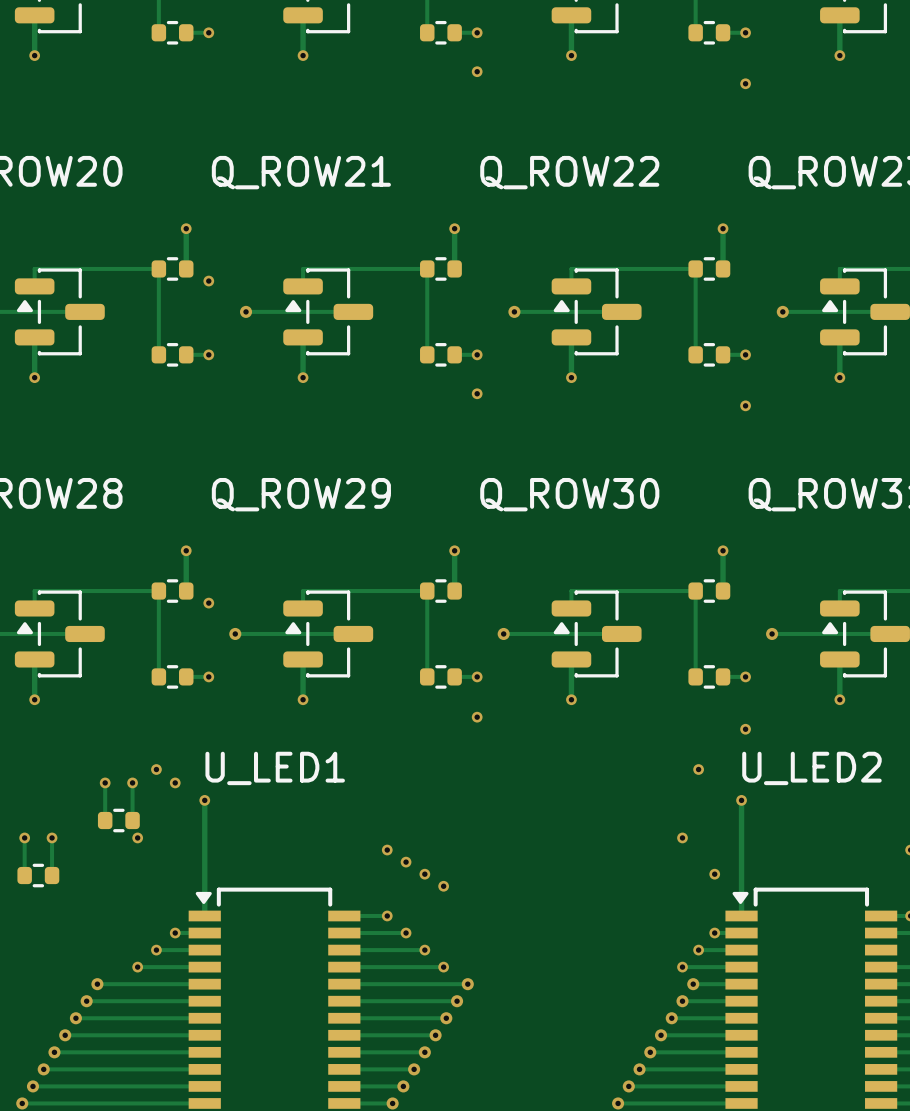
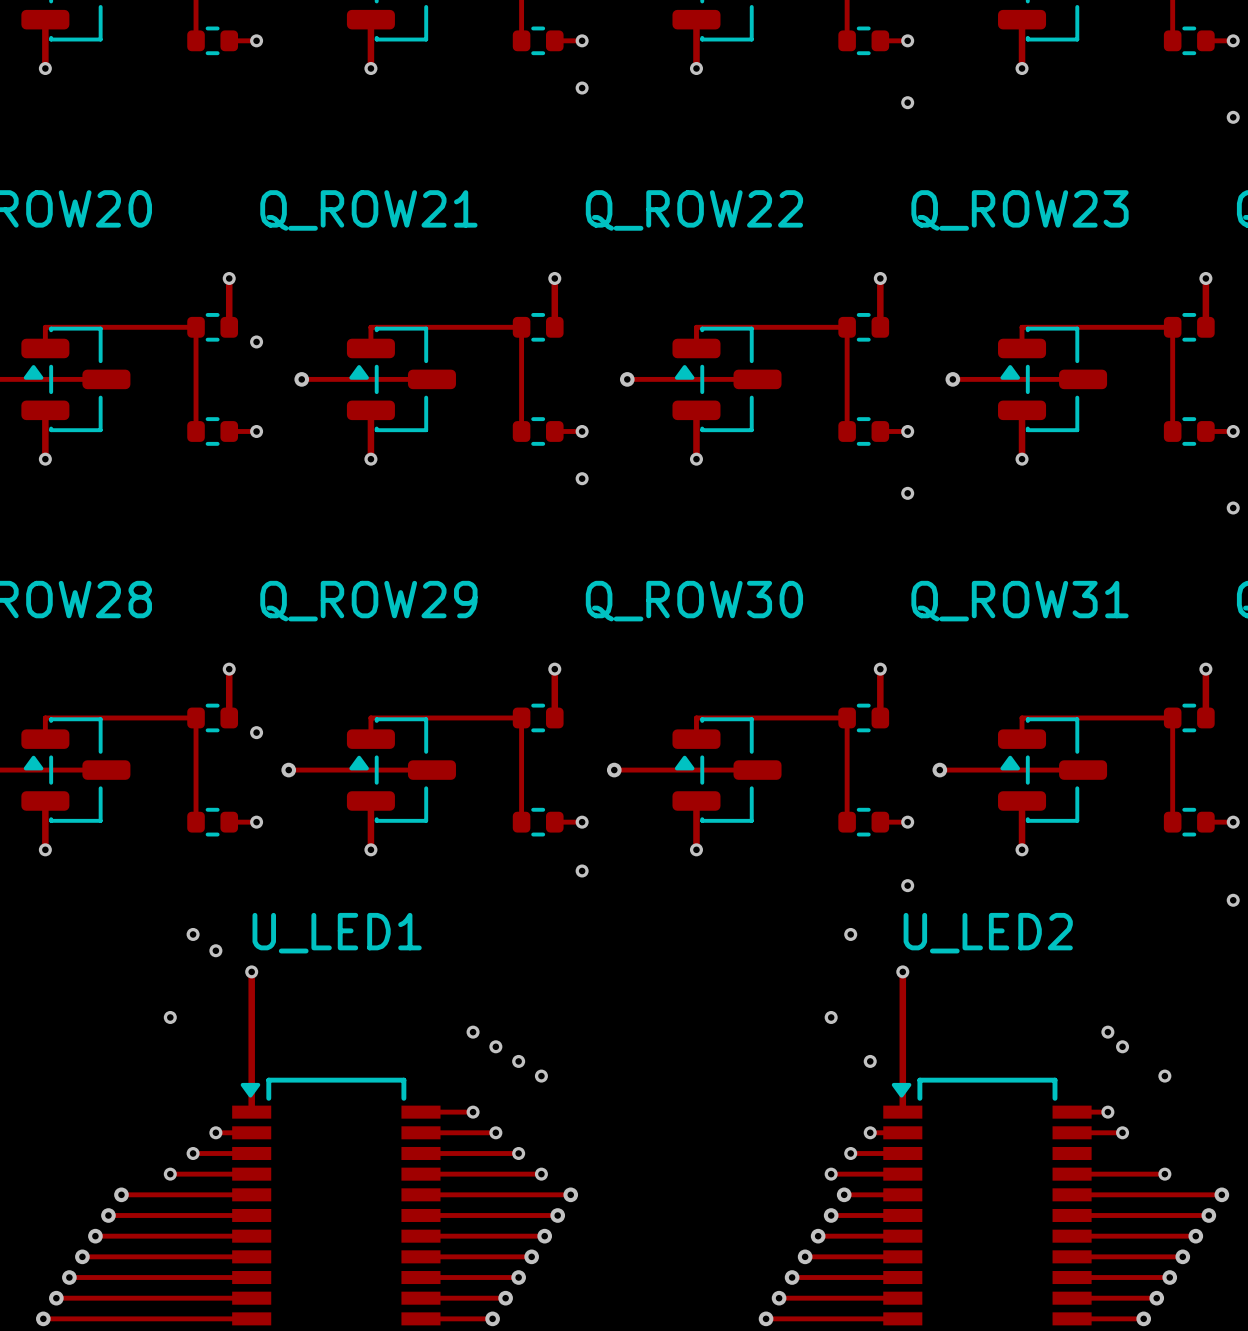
track: (105, 782) (105, 820) -> none
via: (105, 782) -> none
track: (132, 782) (132, 820) -> none
via: (132, 782) -> none
part: (118, 820) -> none
track: (24, 837) (24, 875) -> none
via: (24, 837) -> none
track: (52, 837) (52, 875) -> none
via: (52, 837) -> none
part: (38, 875) -> none

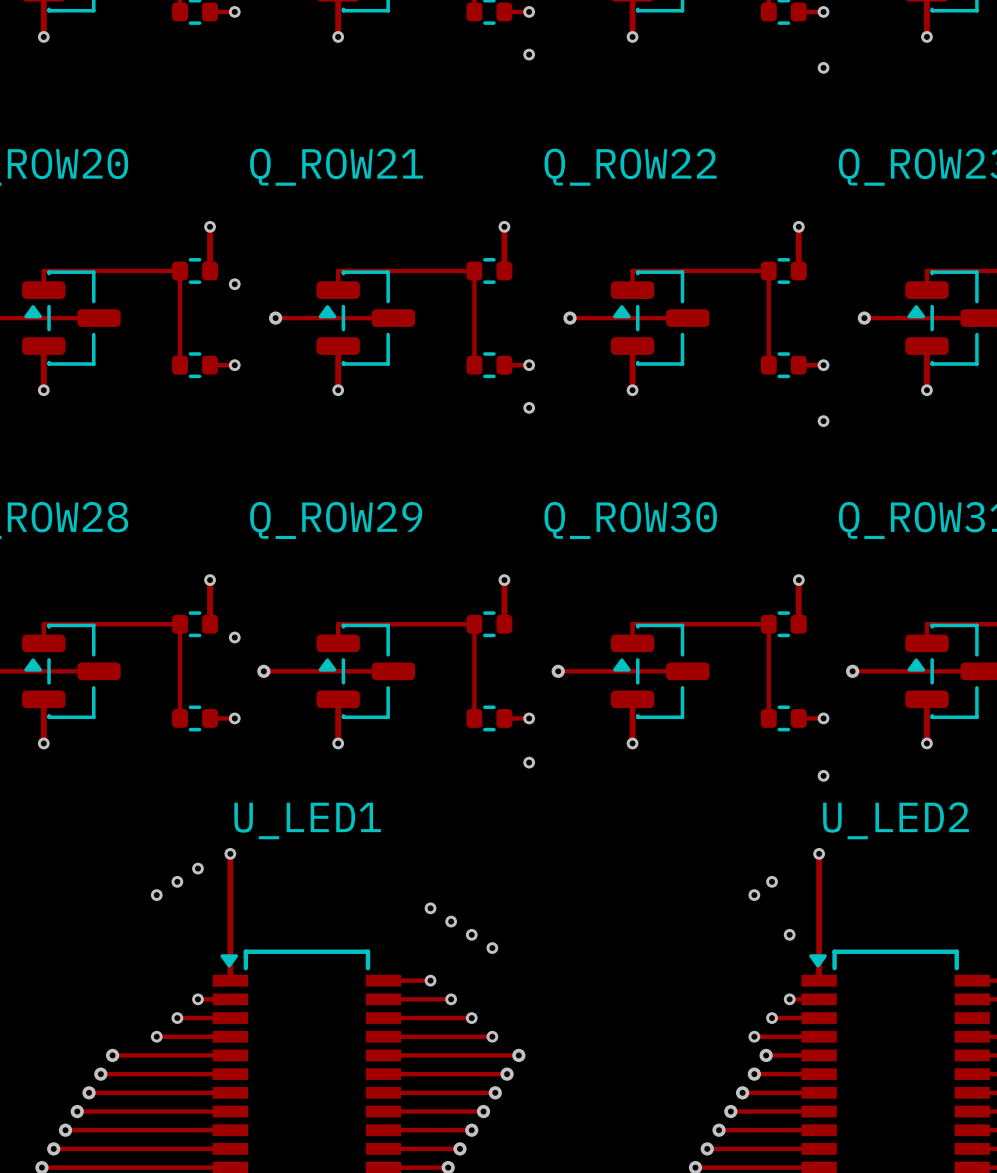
via: (193, 934) -> none
via position: (850, 934) -> (772, 881)
via: (215, 950) -> none
via: none -> (197, 868)
via: none -> (177, 881)

